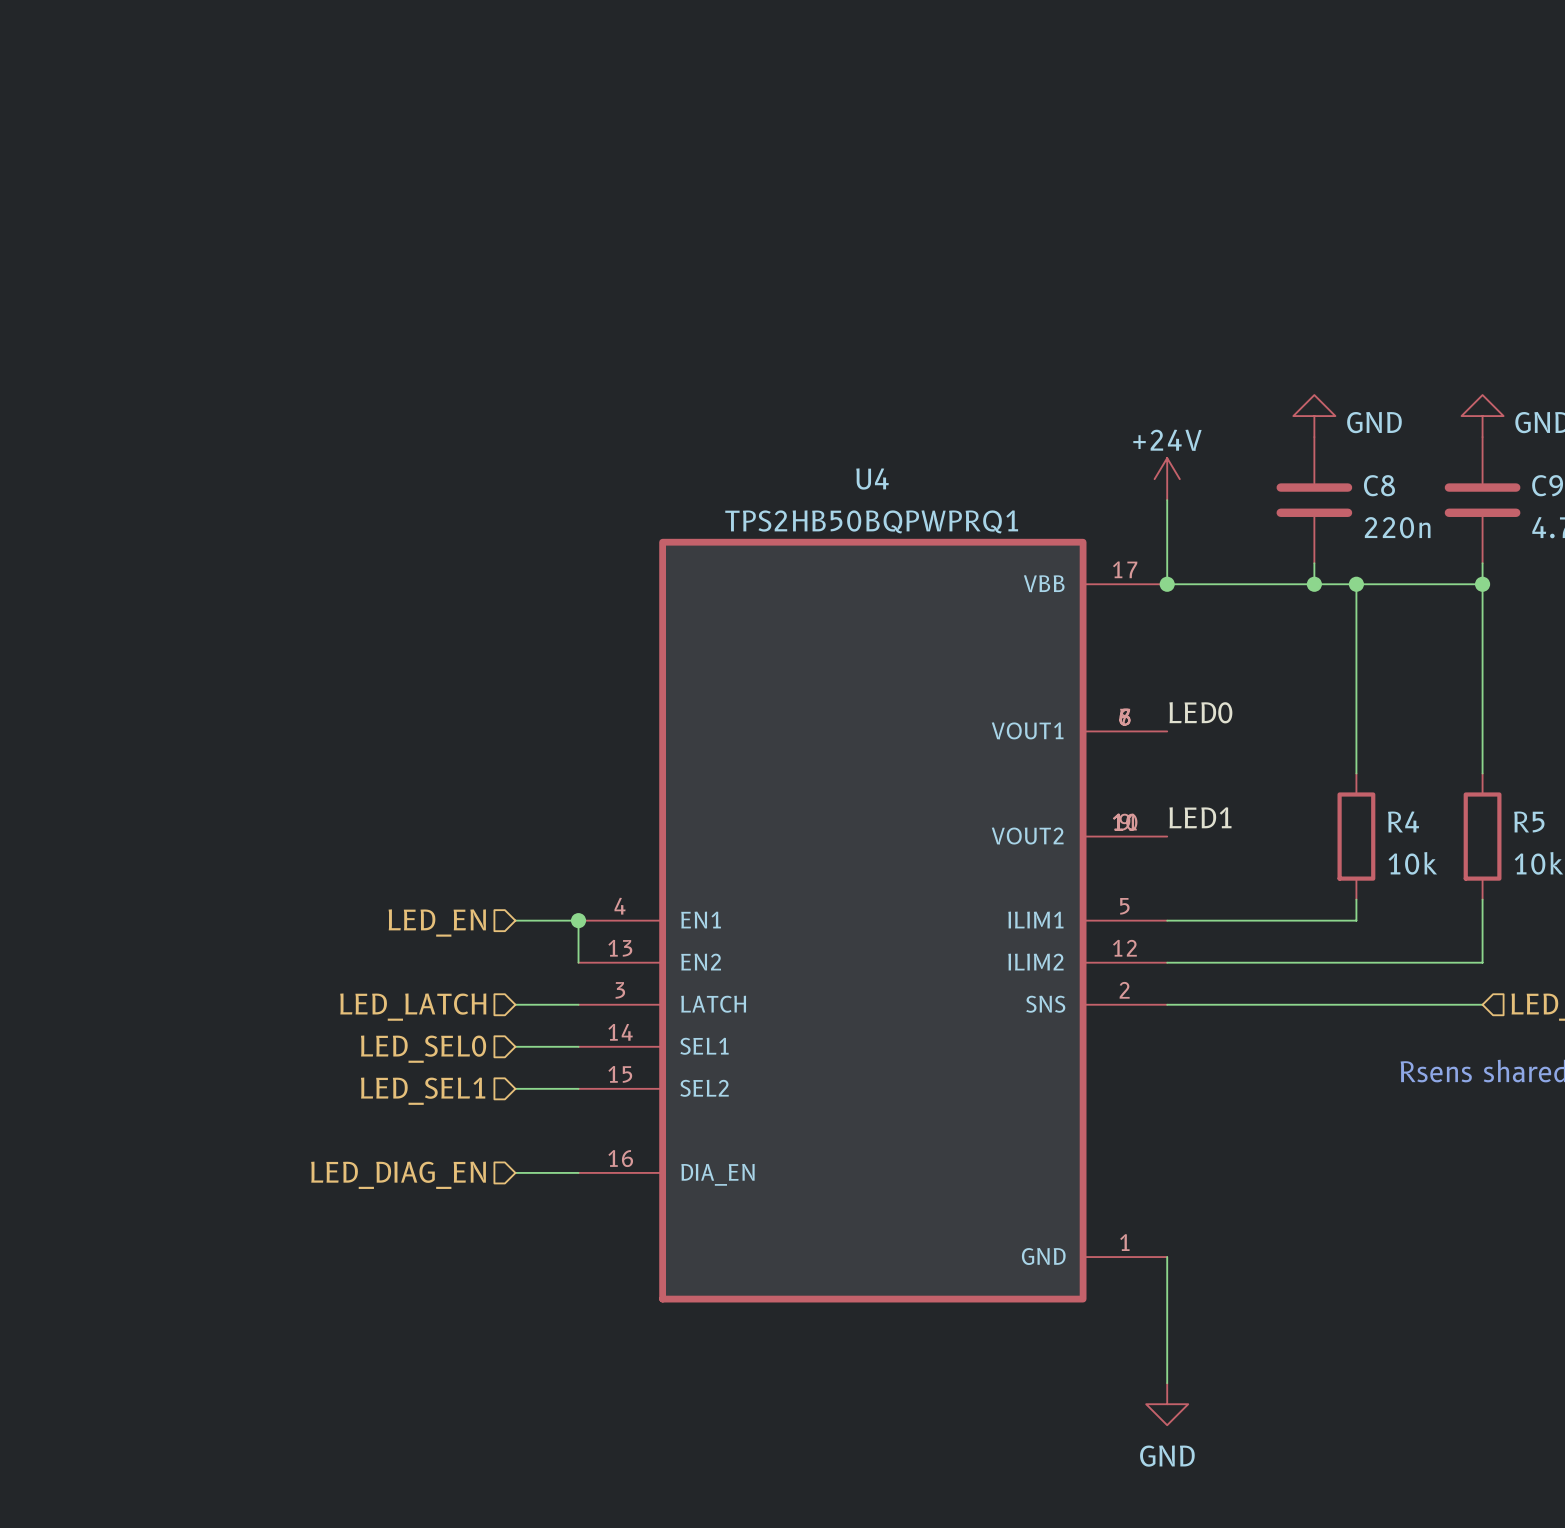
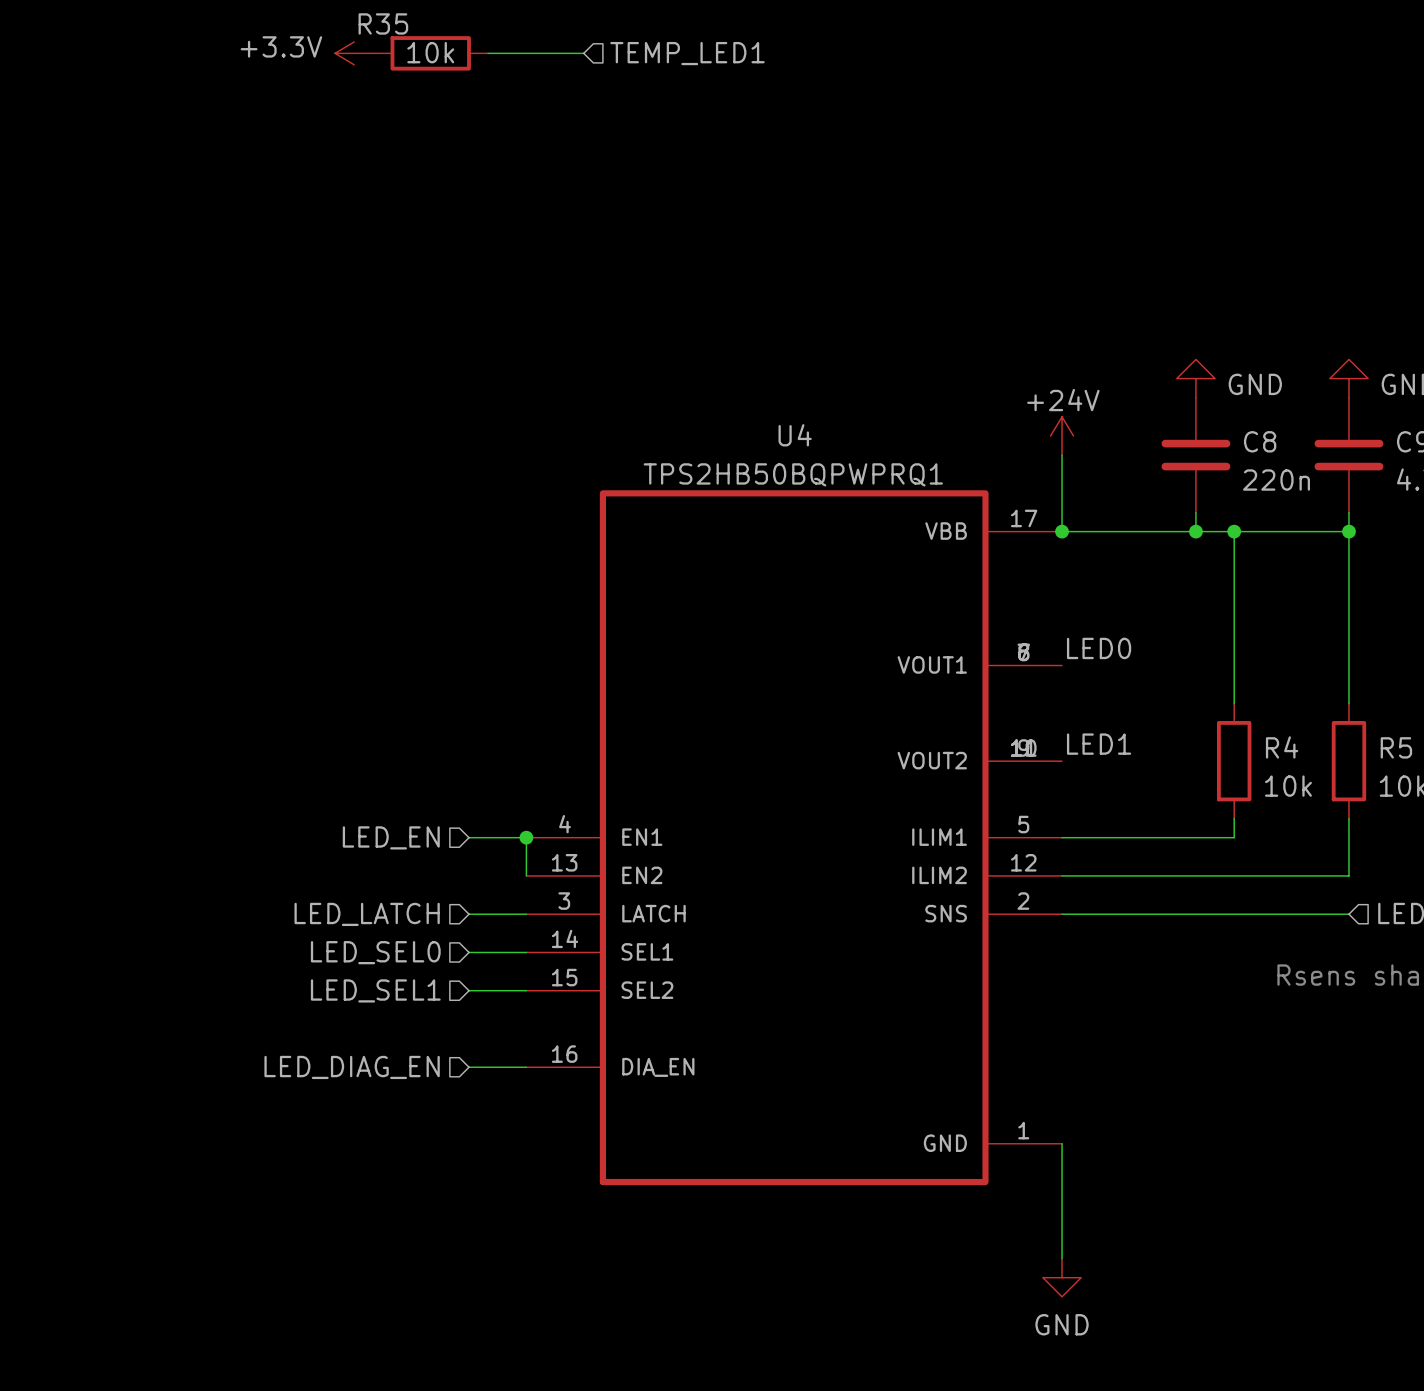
power symbol: none -> +3.3V (354, 53)
R35: none -> 10k (430, 53)
wire: none -> (488, 53) (583, 53)
hierarchical label: none -> TEMP_LED1 (687, 53)

